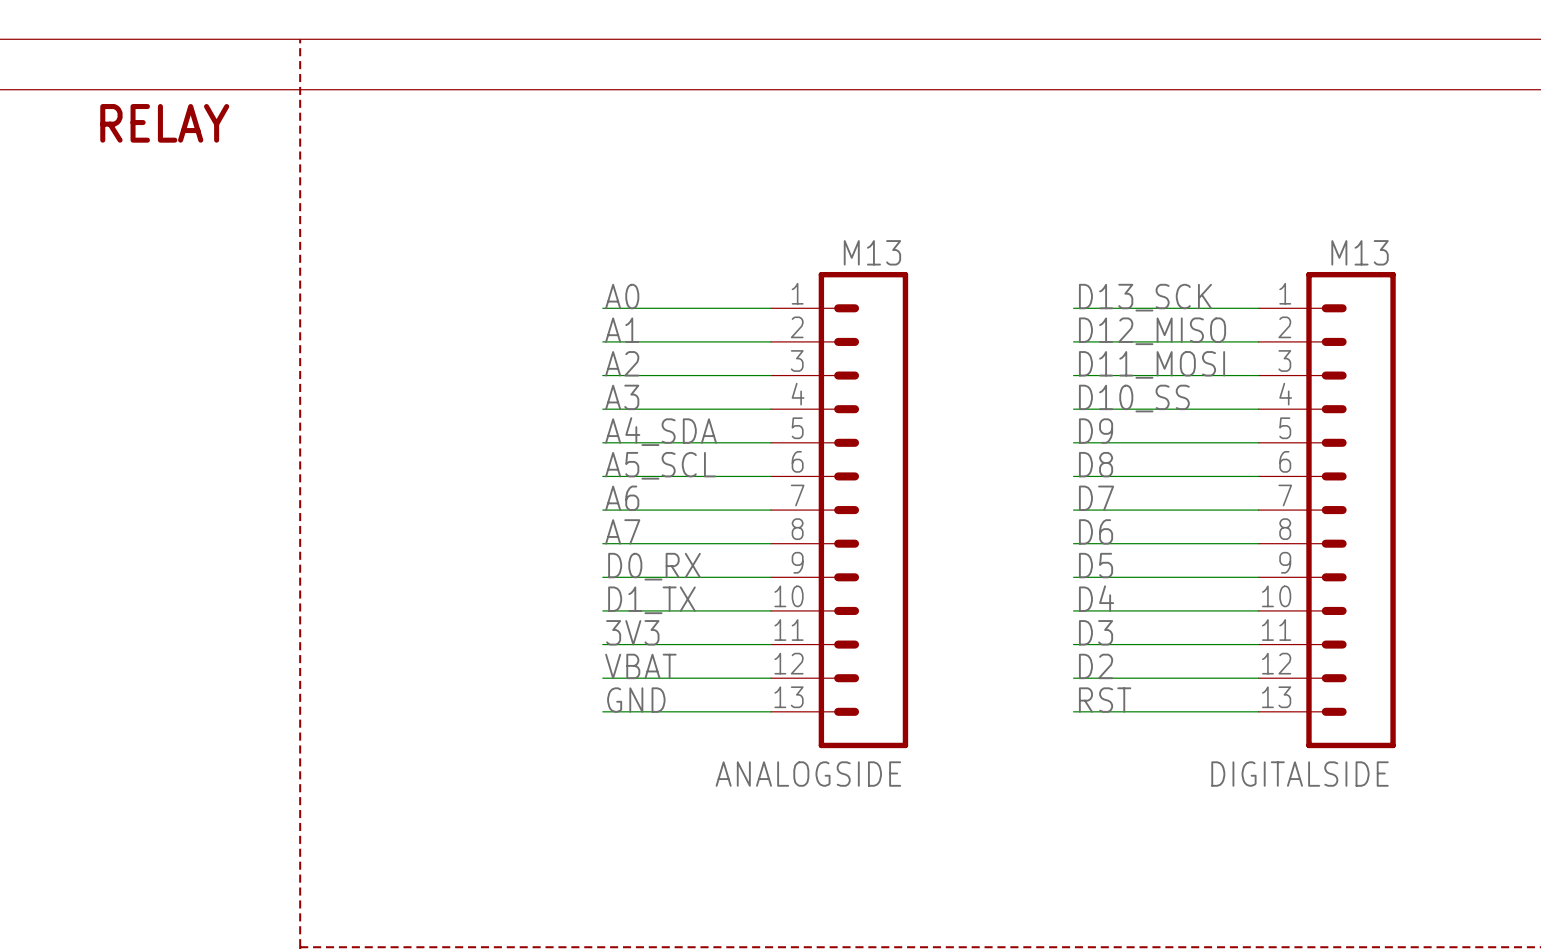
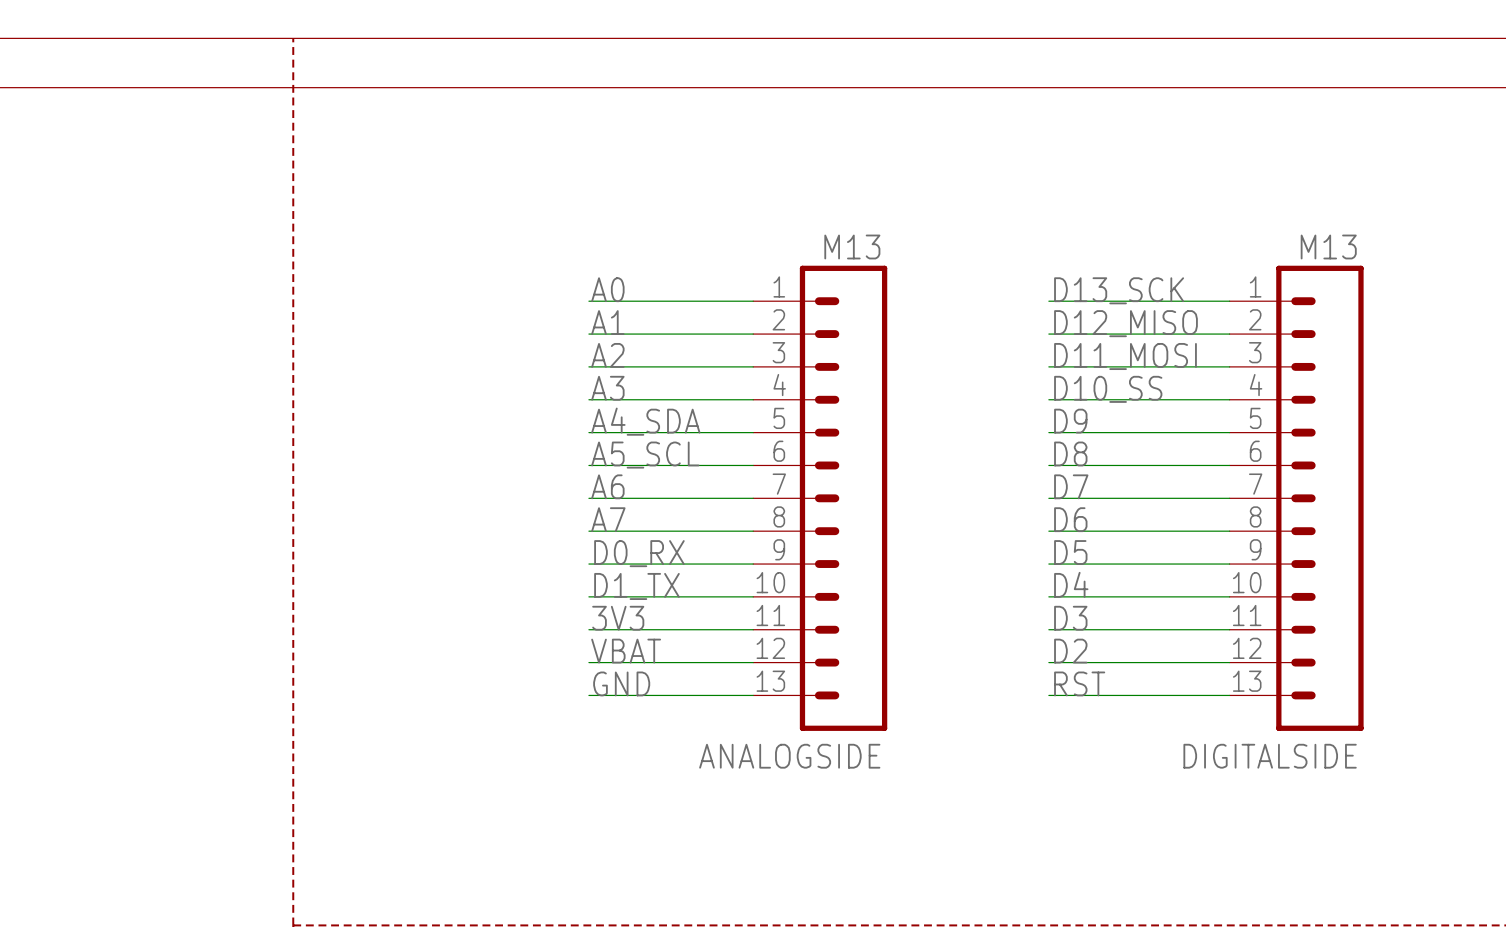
text: RELAY (164, 123) -> none

